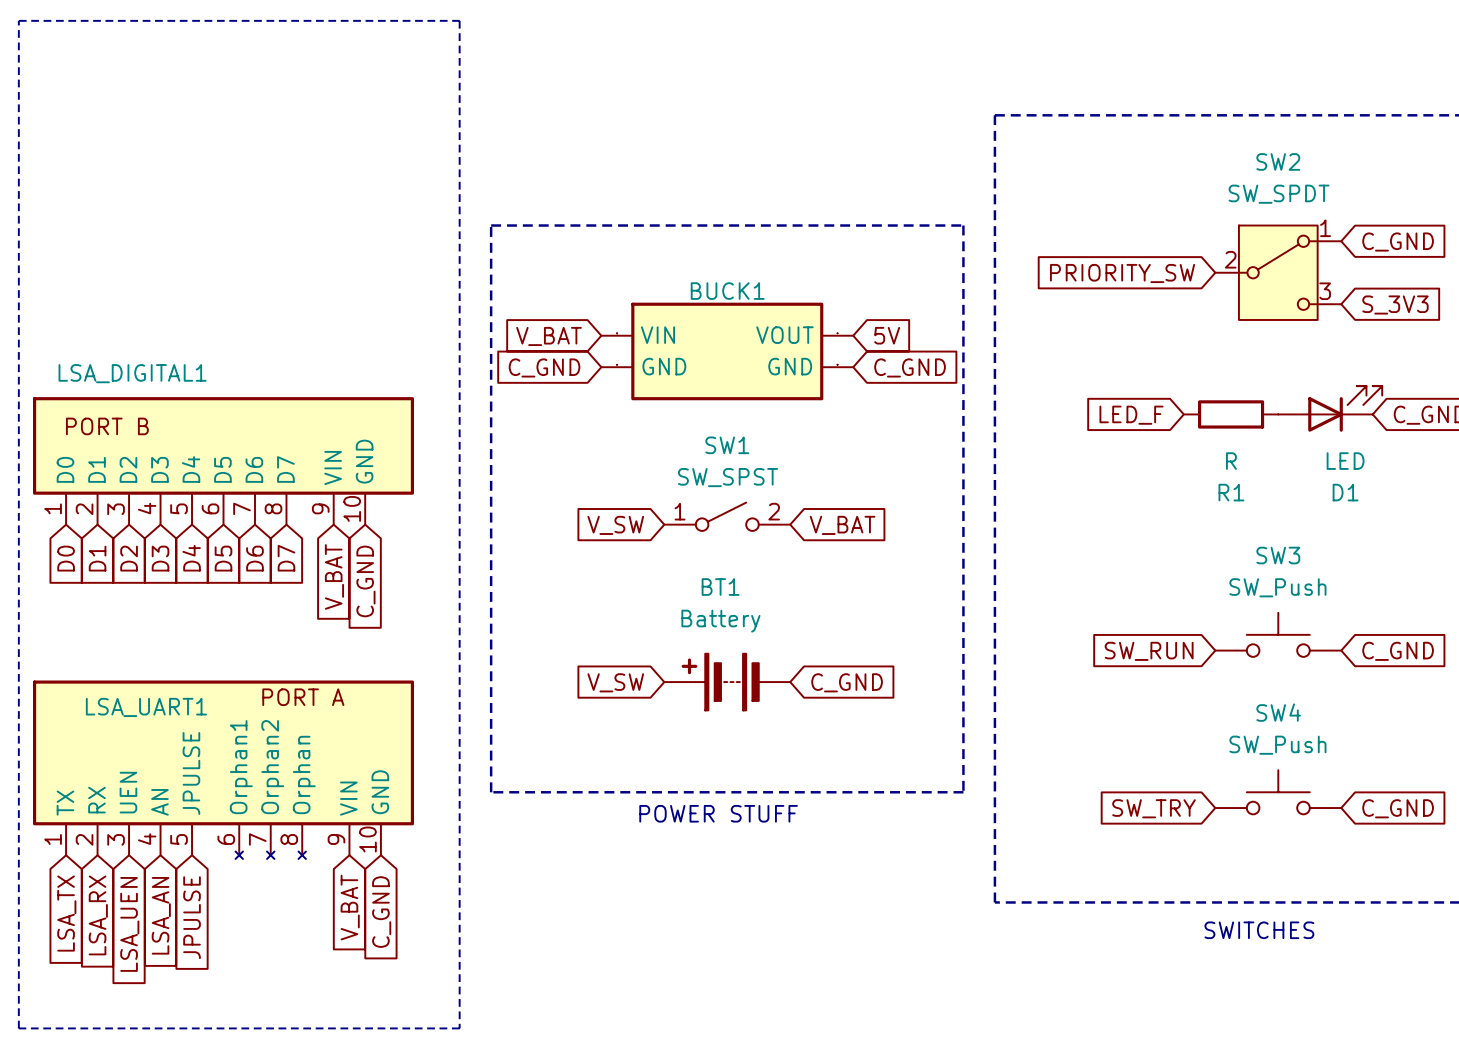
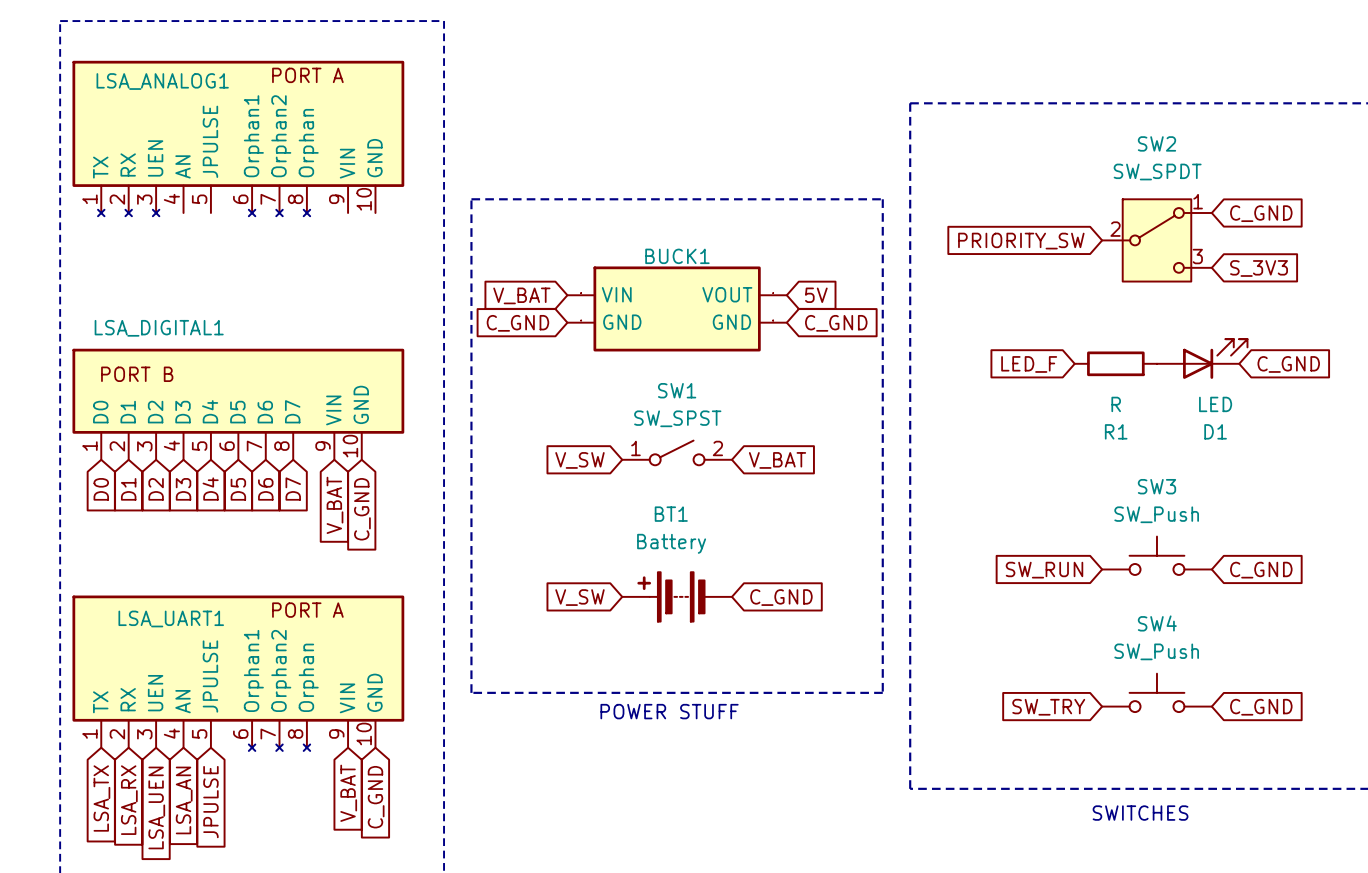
LSA_ANALOG1: none -> (238, 138)

